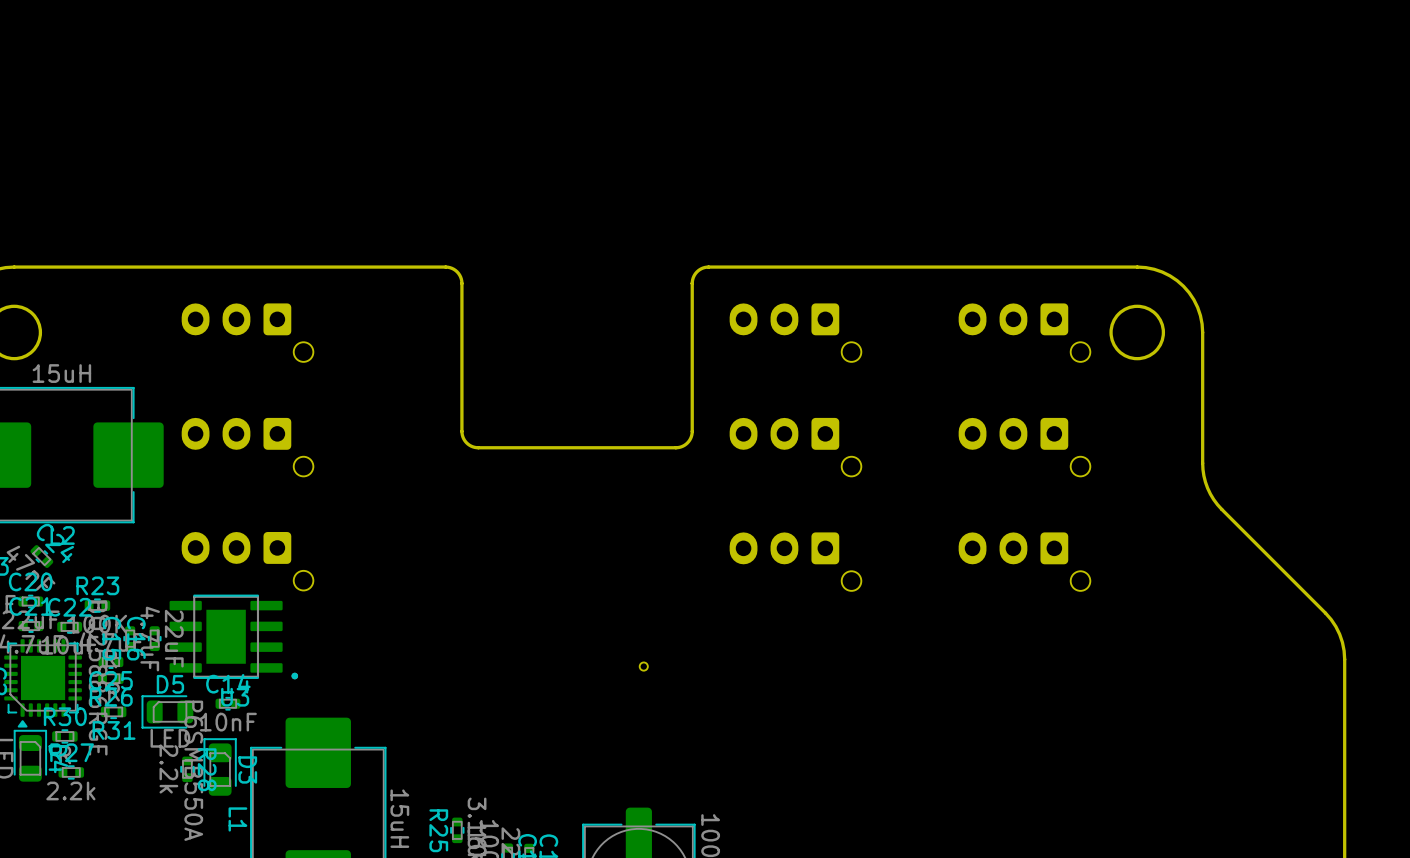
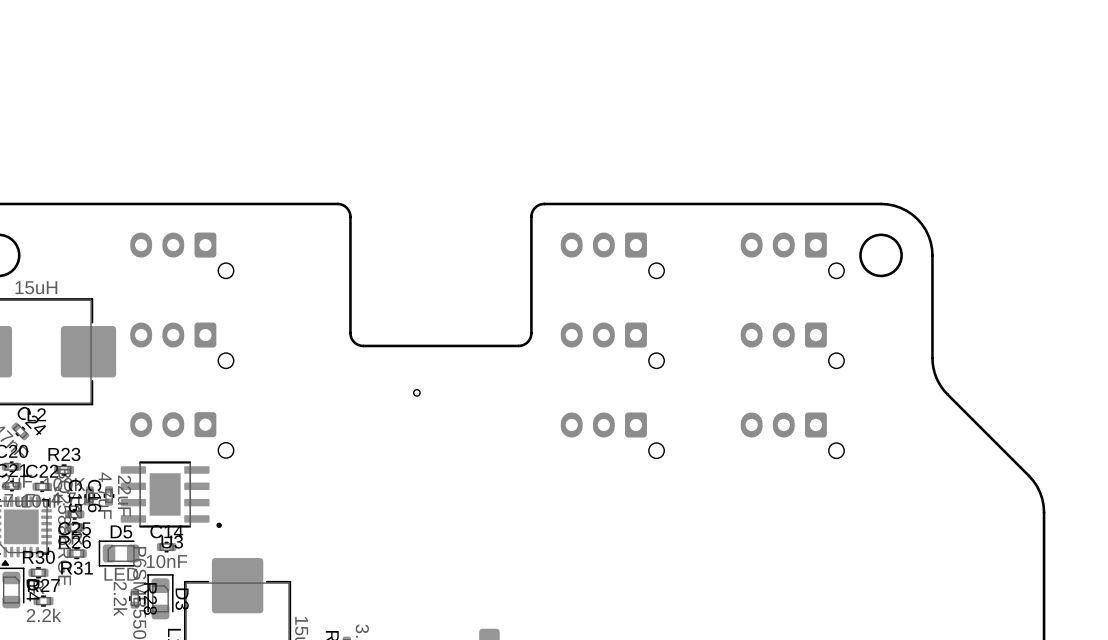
part position: (643, 666) -> (416, 392)

